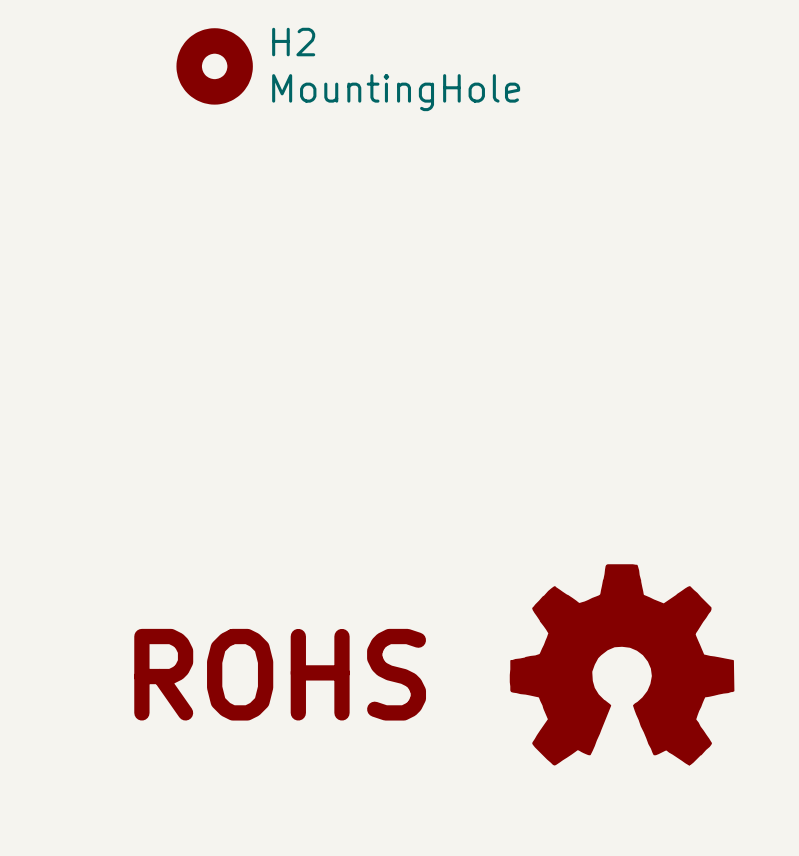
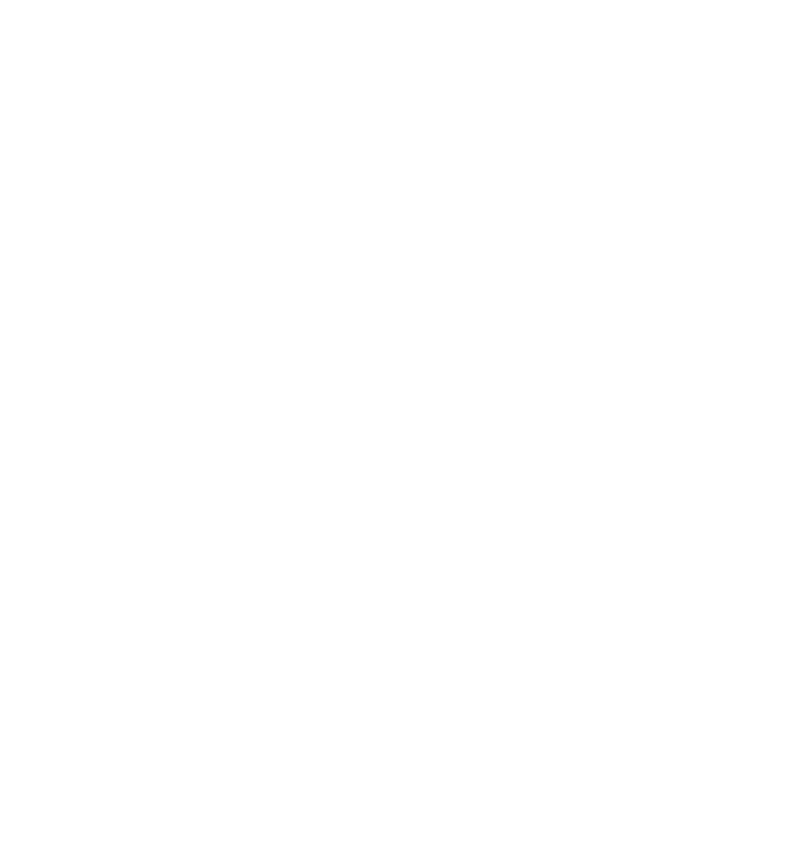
H2: MountingHole (214, 66) -> none
part: (622, 664) -> none
part: (280, 674) -> none

